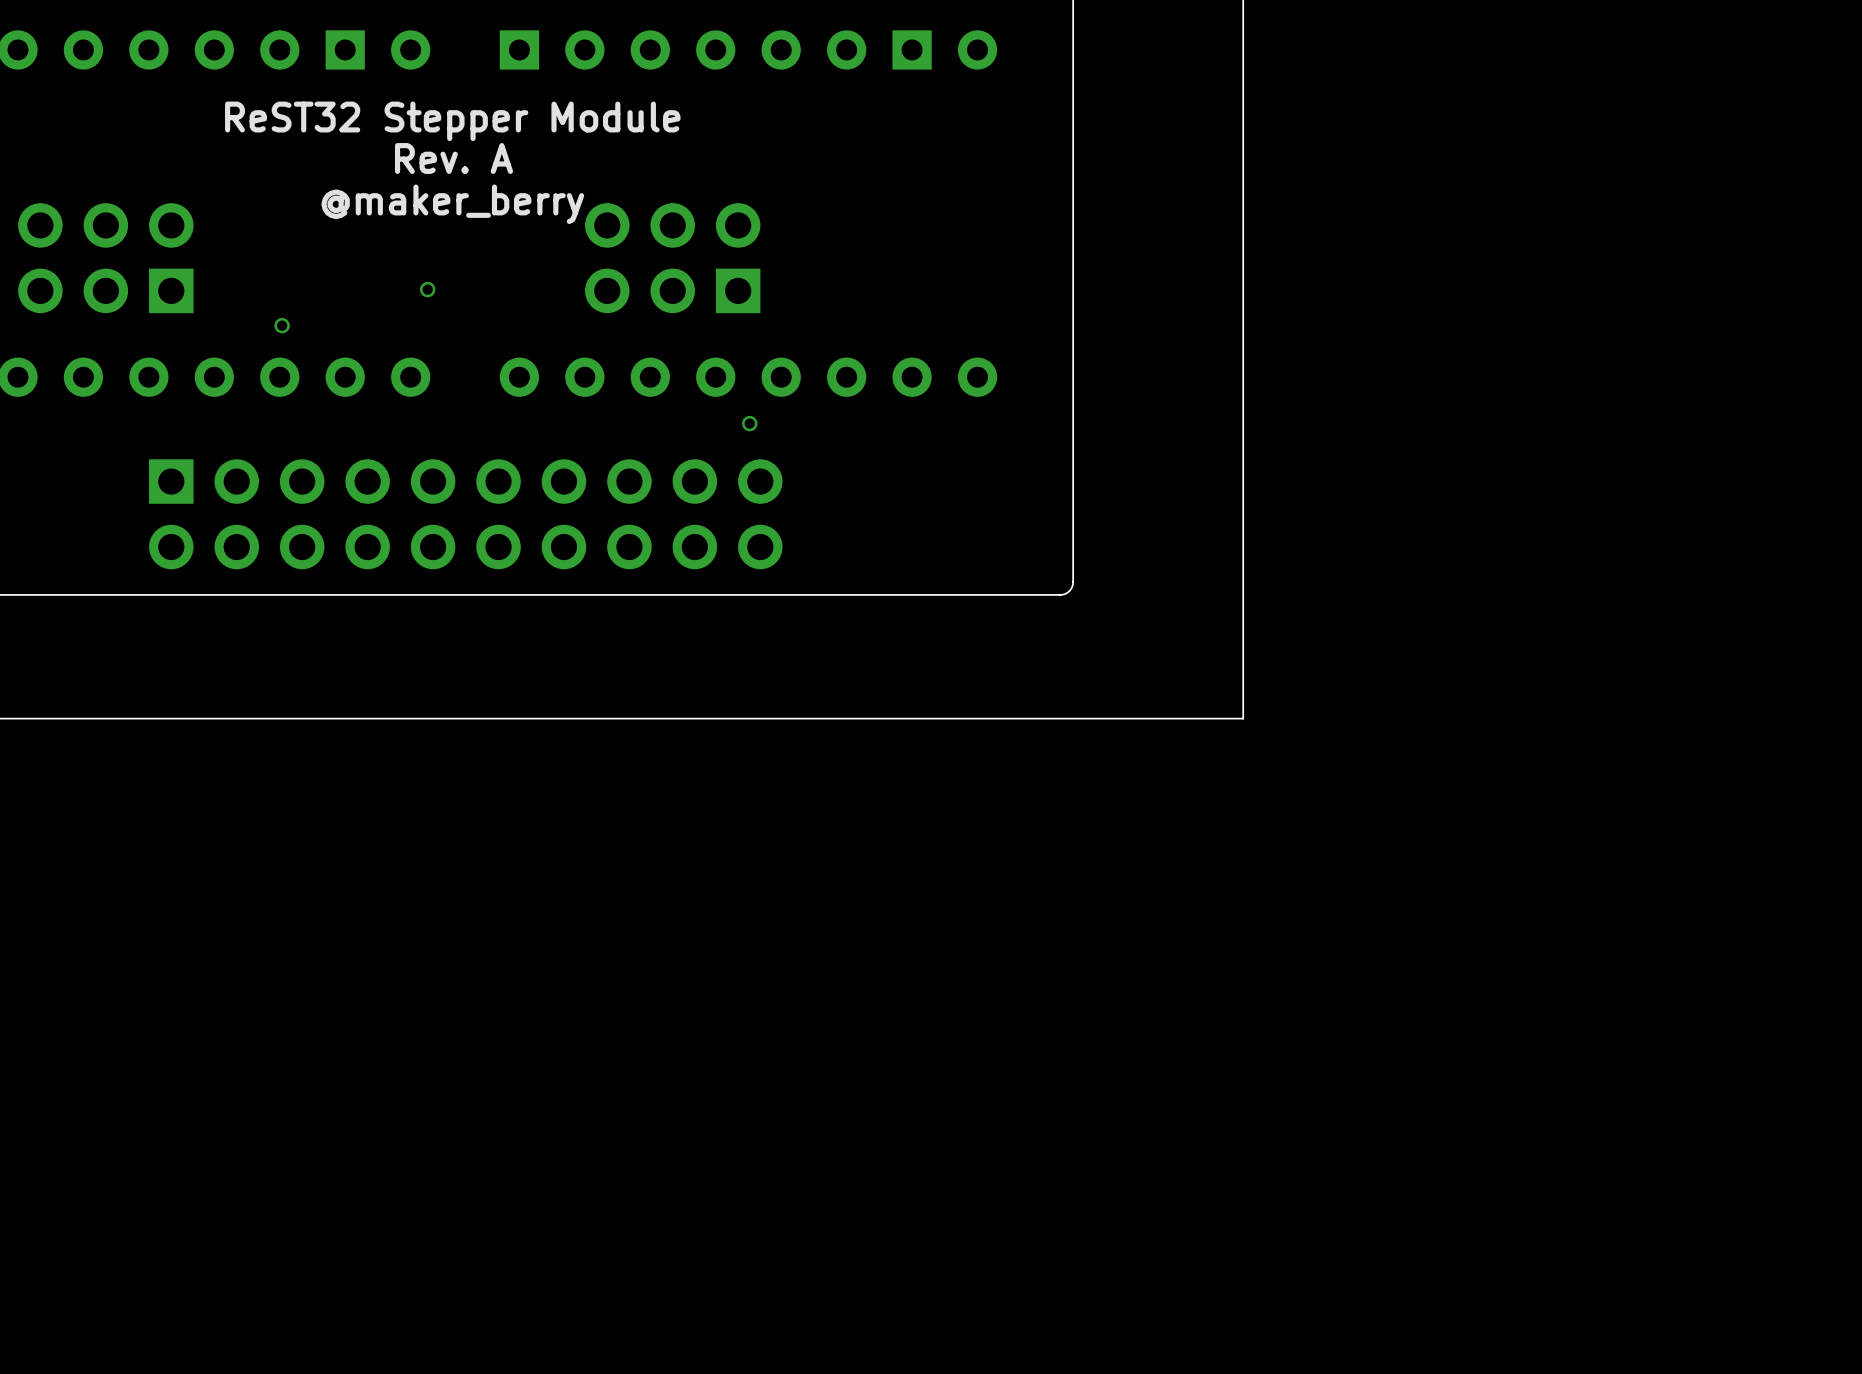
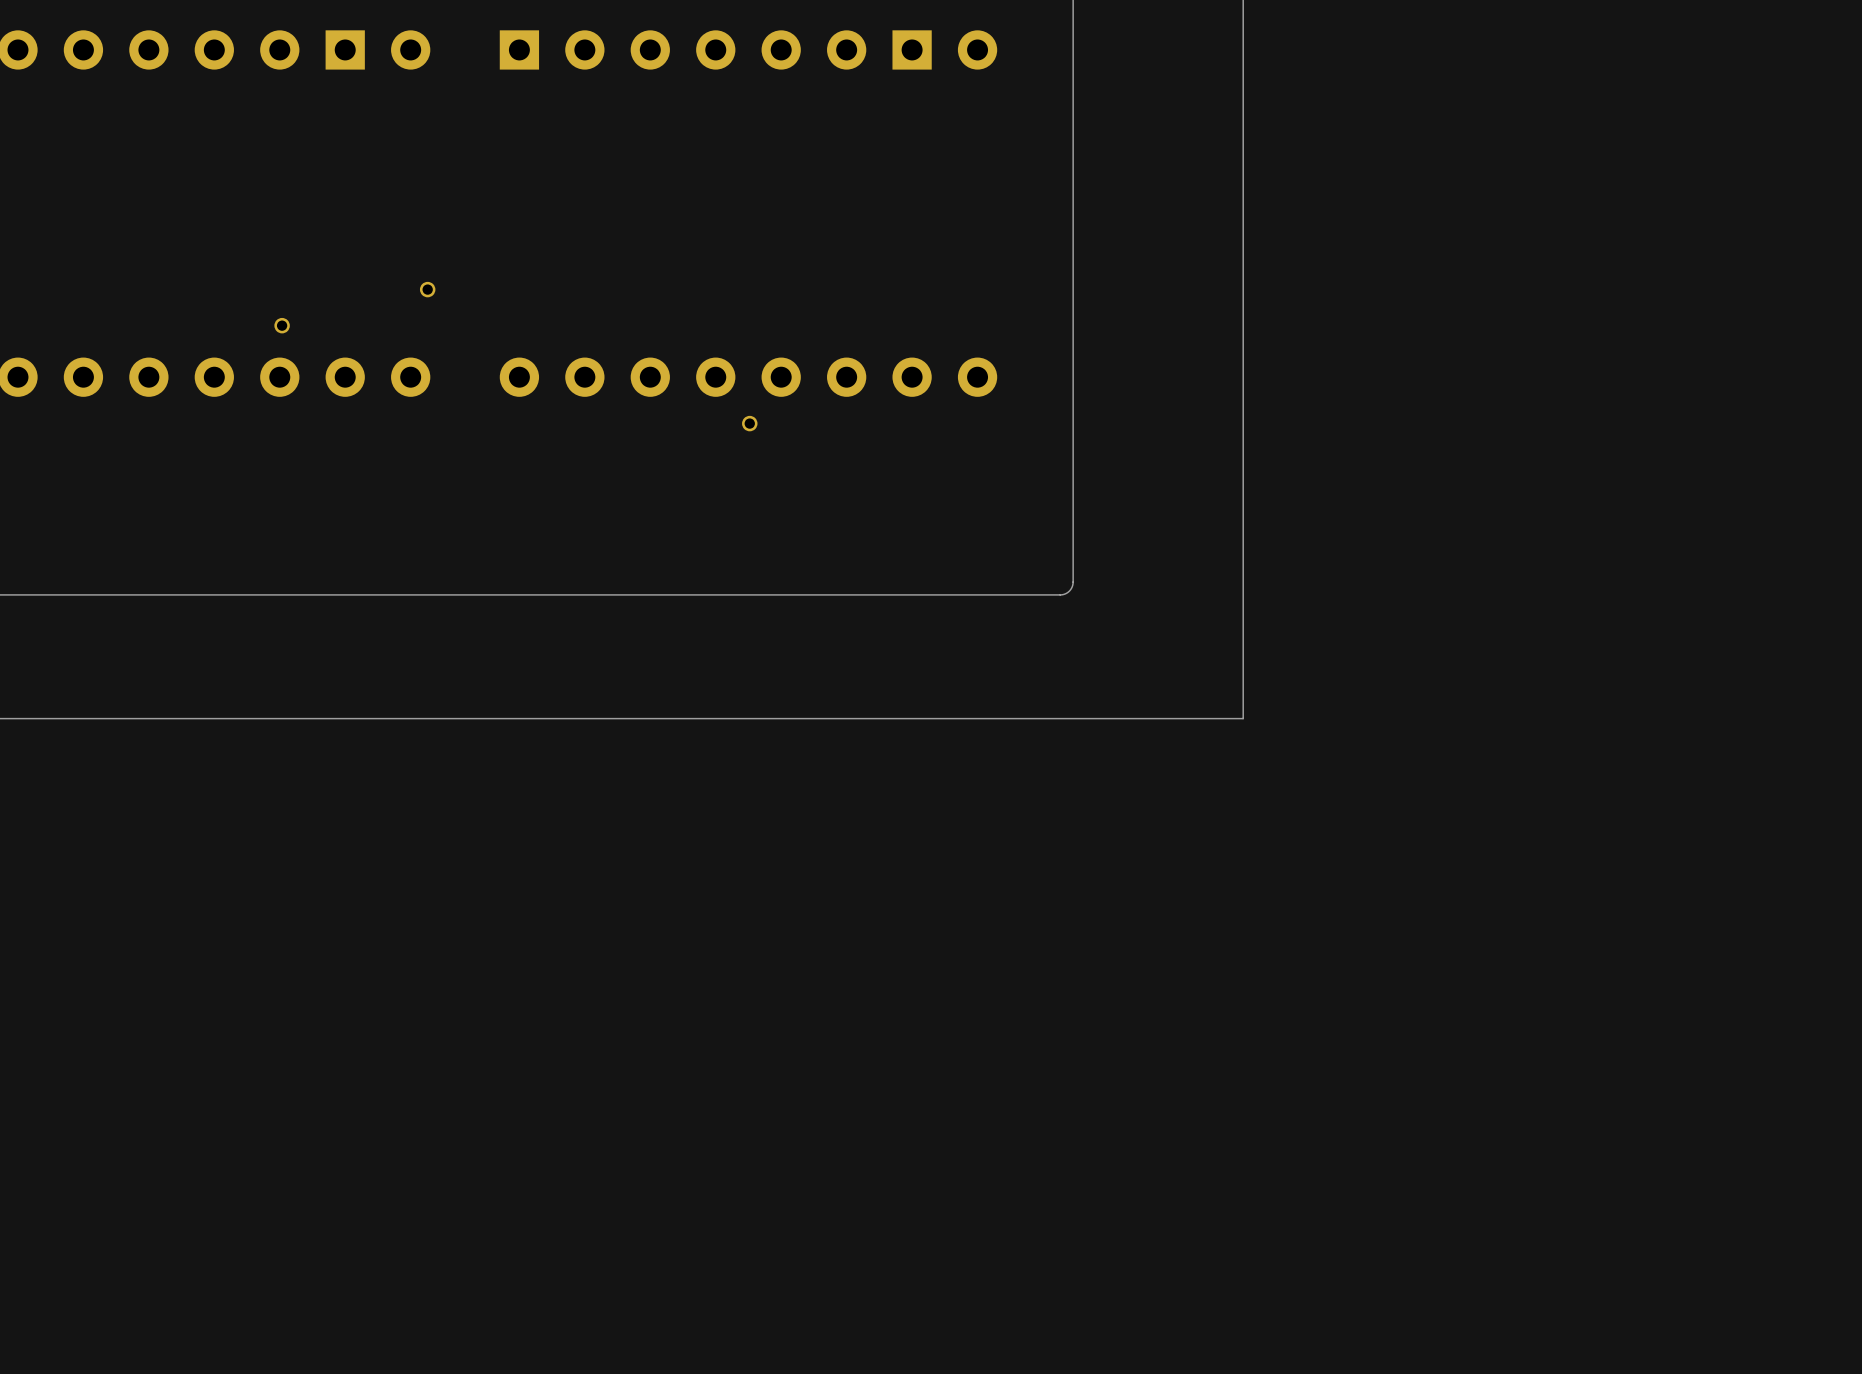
text: ReST32 Stepper Module (452, 121) -> none
text: Rev. A (454, 158) -> none
text: @maker_berry (452, 204) -> none
part: (105, 258) -> none
part: (672, 258) -> none
part: (465, 514) -> none

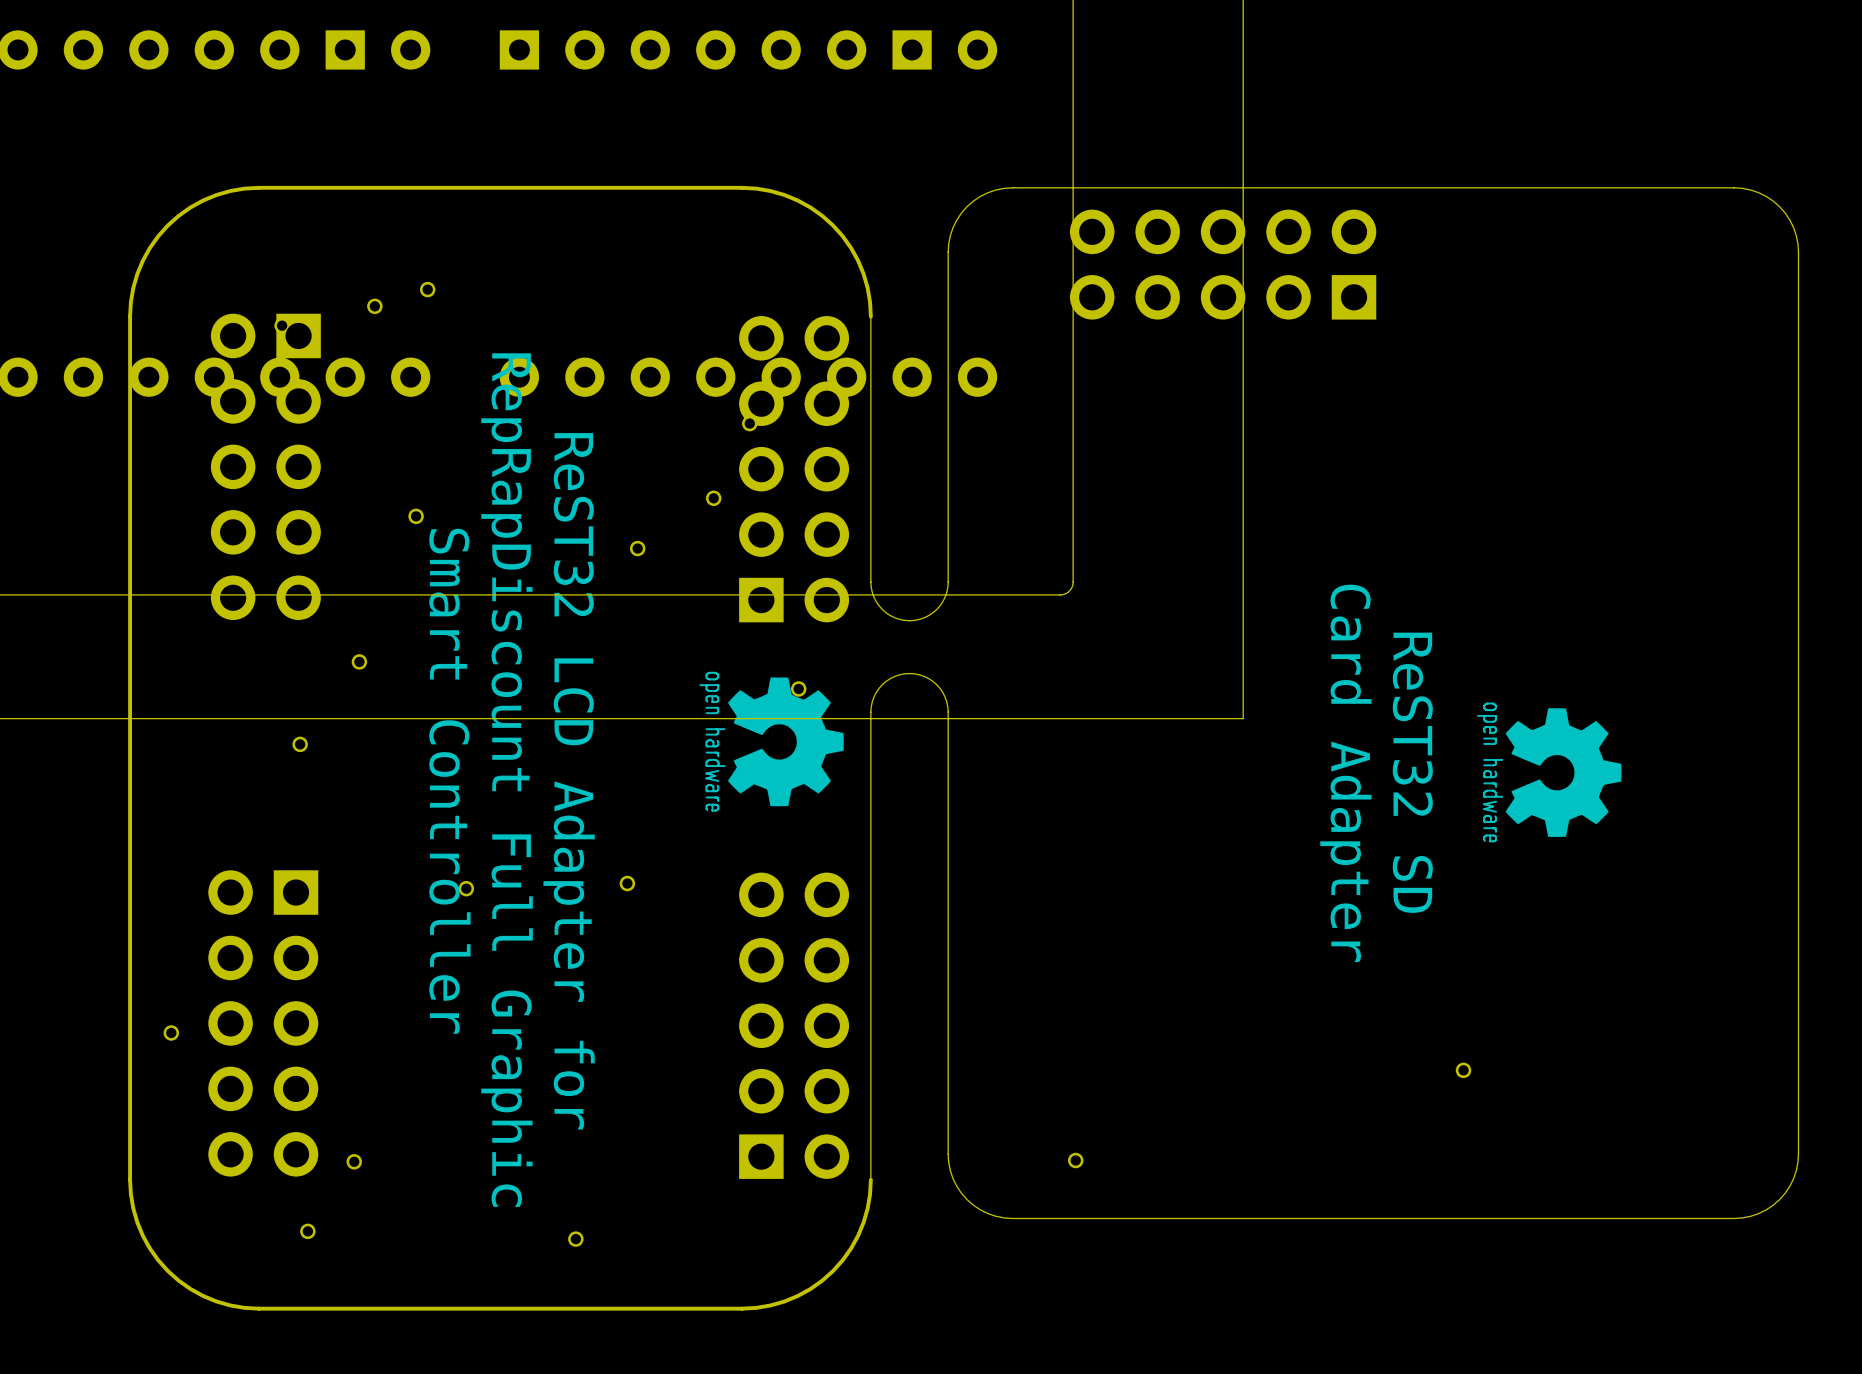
board edge: none -> (1734, 187) (1012, 187) (995, 190) (980, 196) (961, 213) (953, 227) (948, 243) (947, 587) (942, 601) (933, 612) (924, 617) (909, 620) (894, 617) (885, 612) (876, 601) (871, 587) (870, 316) (867, 287) (863, 274) (851, 248) (833, 225) (810, 207) (784, 195) (770, 191) (742, 187) (258, 187) (230, 191) (216, 195) (190, 207) (167, 225) (149, 248) (142, 260) (133, 287) (130, 316) (130, 1179) (130, 1194) (137, 1222) (149, 1248) (167, 1270) (190, 1288) (216, 1301) (244, 1307) (258, 1308) (742, 1308) (756, 1307) (784, 1301) (810, 1288) (822, 1280) (833, 1270) (851, 1248) (863, 1222) (870, 1194) (871, 707) (876, 692) (885, 681) (894, 676) (909, 673) (924, 676) (933, 681) (942, 692) (947, 707) (948, 1154) (950, 1170) (956, 1186) (967, 1199) (980, 1209) (995, 1216) (1012, 1218) (1734, 1218) (1750, 1216) (1773, 1205) (1785, 1193) (1793, 1178) (1798, 1154) (1798, 252) (1793, 227) (1779, 206) (1758, 192) (1734, 187)
part: none -> (1223, 264)
part: none -> (374, 306)
part: none -> (265, 466)
part: none -> (794, 469)
part: none -> (713, 498)
part: none -> (416, 516)
part: none -> (637, 548)
part: none -> (359, 661)
drawing: none -> [699, 671, 844, 812]
part: none -> (798, 688)
drawing: none -> [1477, 702, 1622, 843]
part: none -> (300, 744)
text: none -> ReST32 SD (1412, 772)
text: none -> Card Adapter (1345, 773)
text: none -> RepRapDiscount Full Graphic (507, 780)
text: none -> Smart Controller (449, 781)
text: none -> ReST32 LCD Adapter for (569, 781)
part: none -> (627, 883)
part: none -> (466, 888)
part: none -> (263, 1023)
part: none -> (794, 1025)
part: none -> (171, 1032)
part: none -> (1463, 1070)
part: none -> (1075, 1160)
part: none -> (354, 1161)
part: none -> (307, 1231)
part: none -> (575, 1239)

